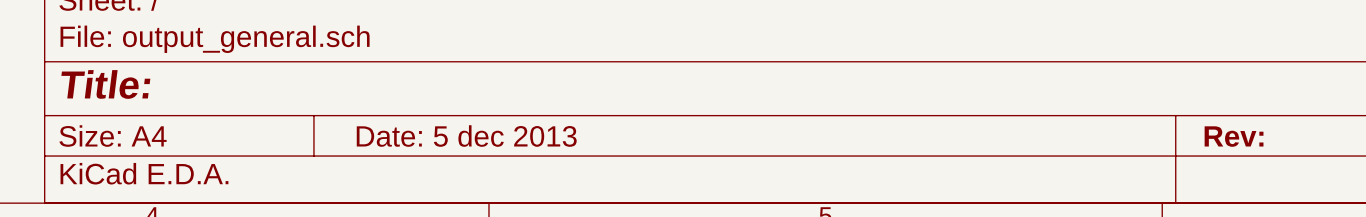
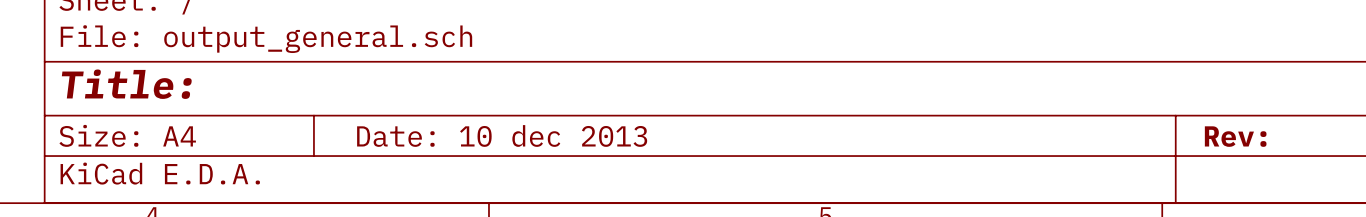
title block: Date: 5 dec 2013 (466, 136) -> Date: 10 dec 2013 (502, 135)

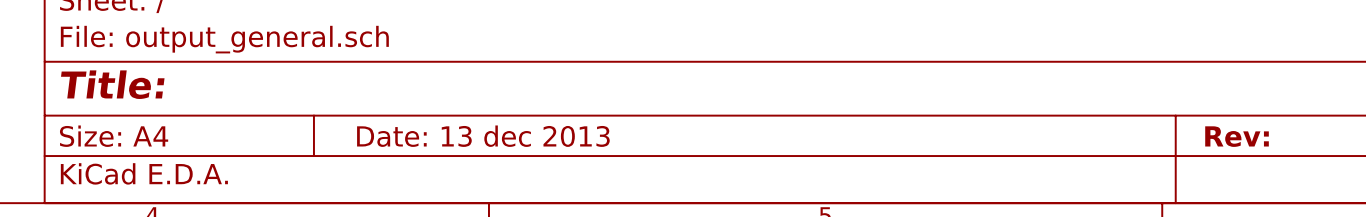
title block: Date: 10 dec 2013 (502, 135) -> Date: 13 dec 2013 (483, 136)

